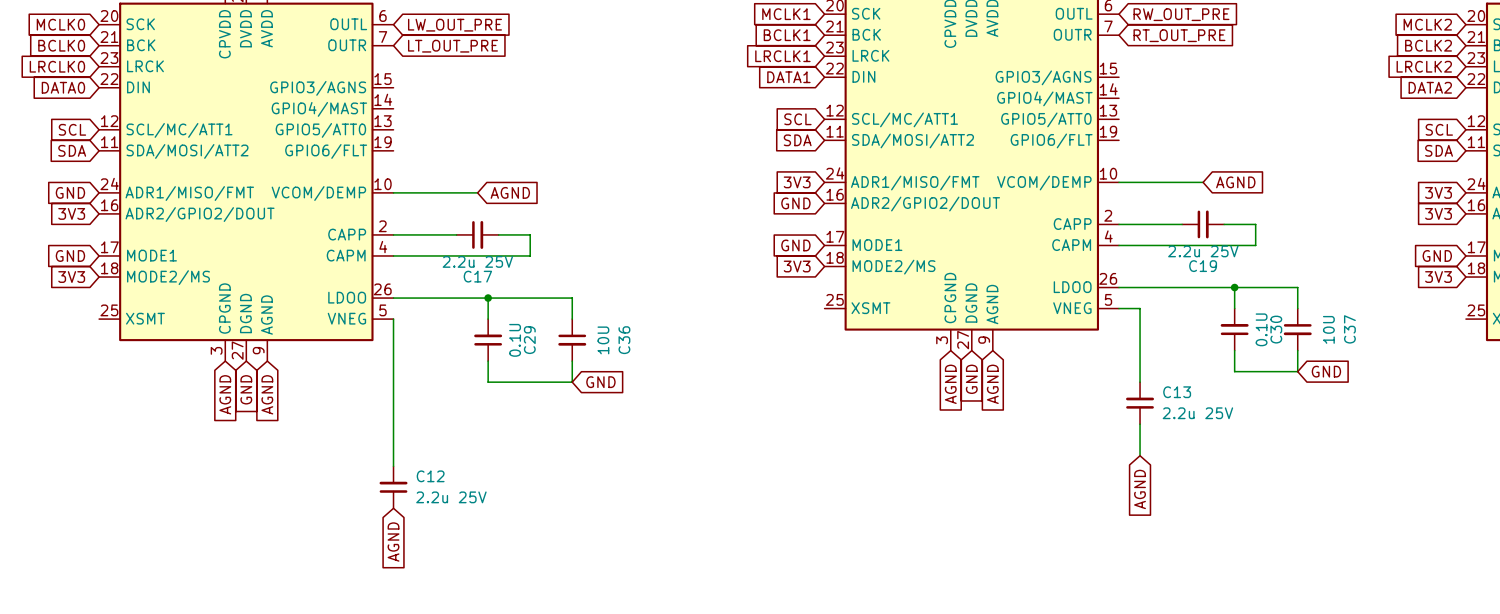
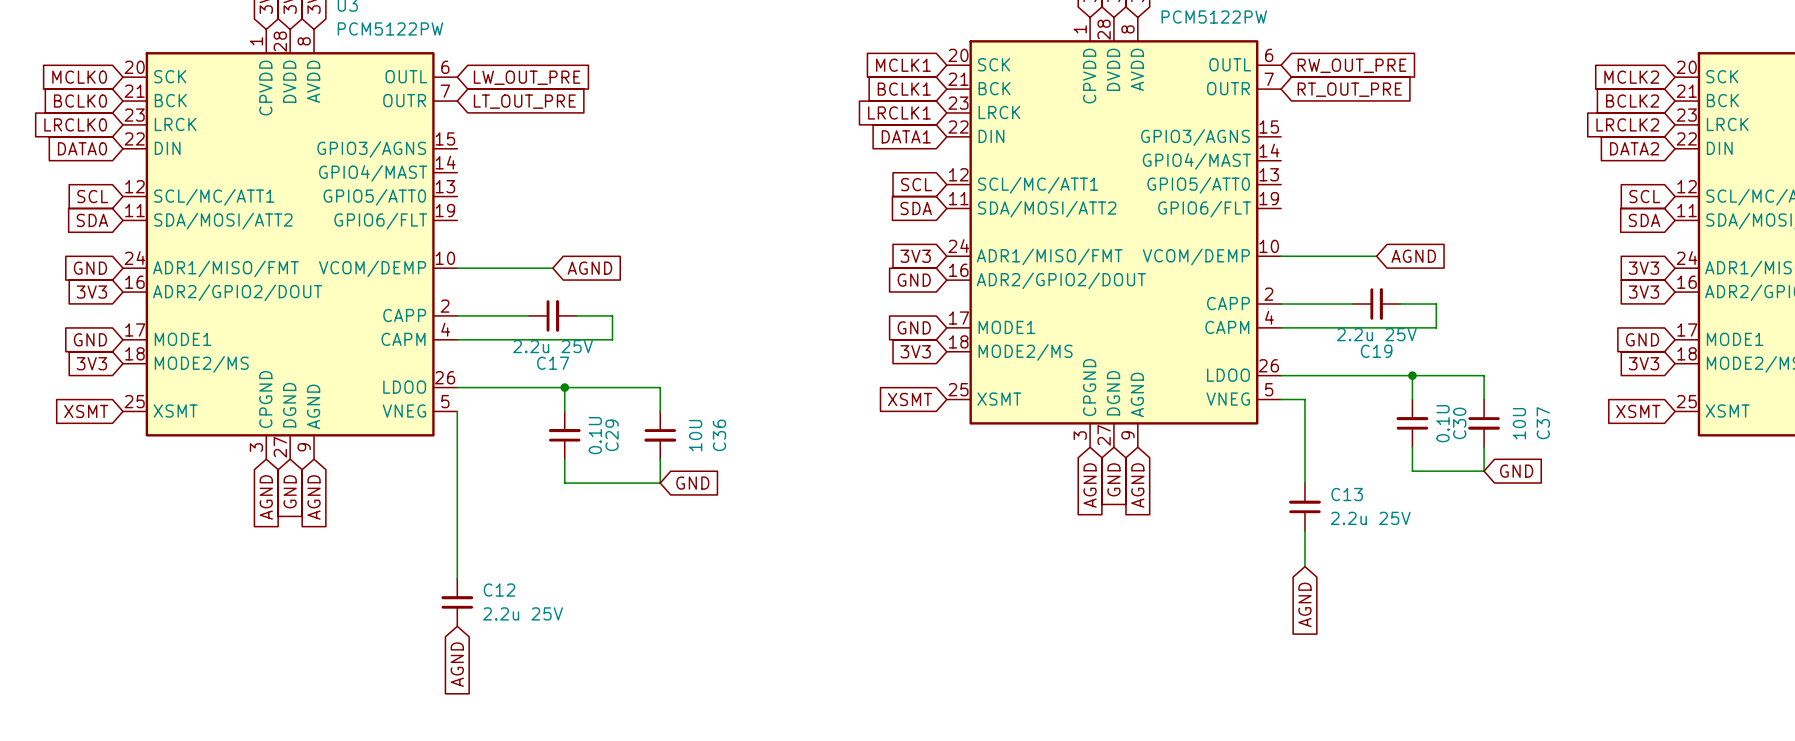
global label: none -> XSMT (909, 399)
global label: none -> XSMT (86, 411)
global label: none -> XSMT (1638, 411)

